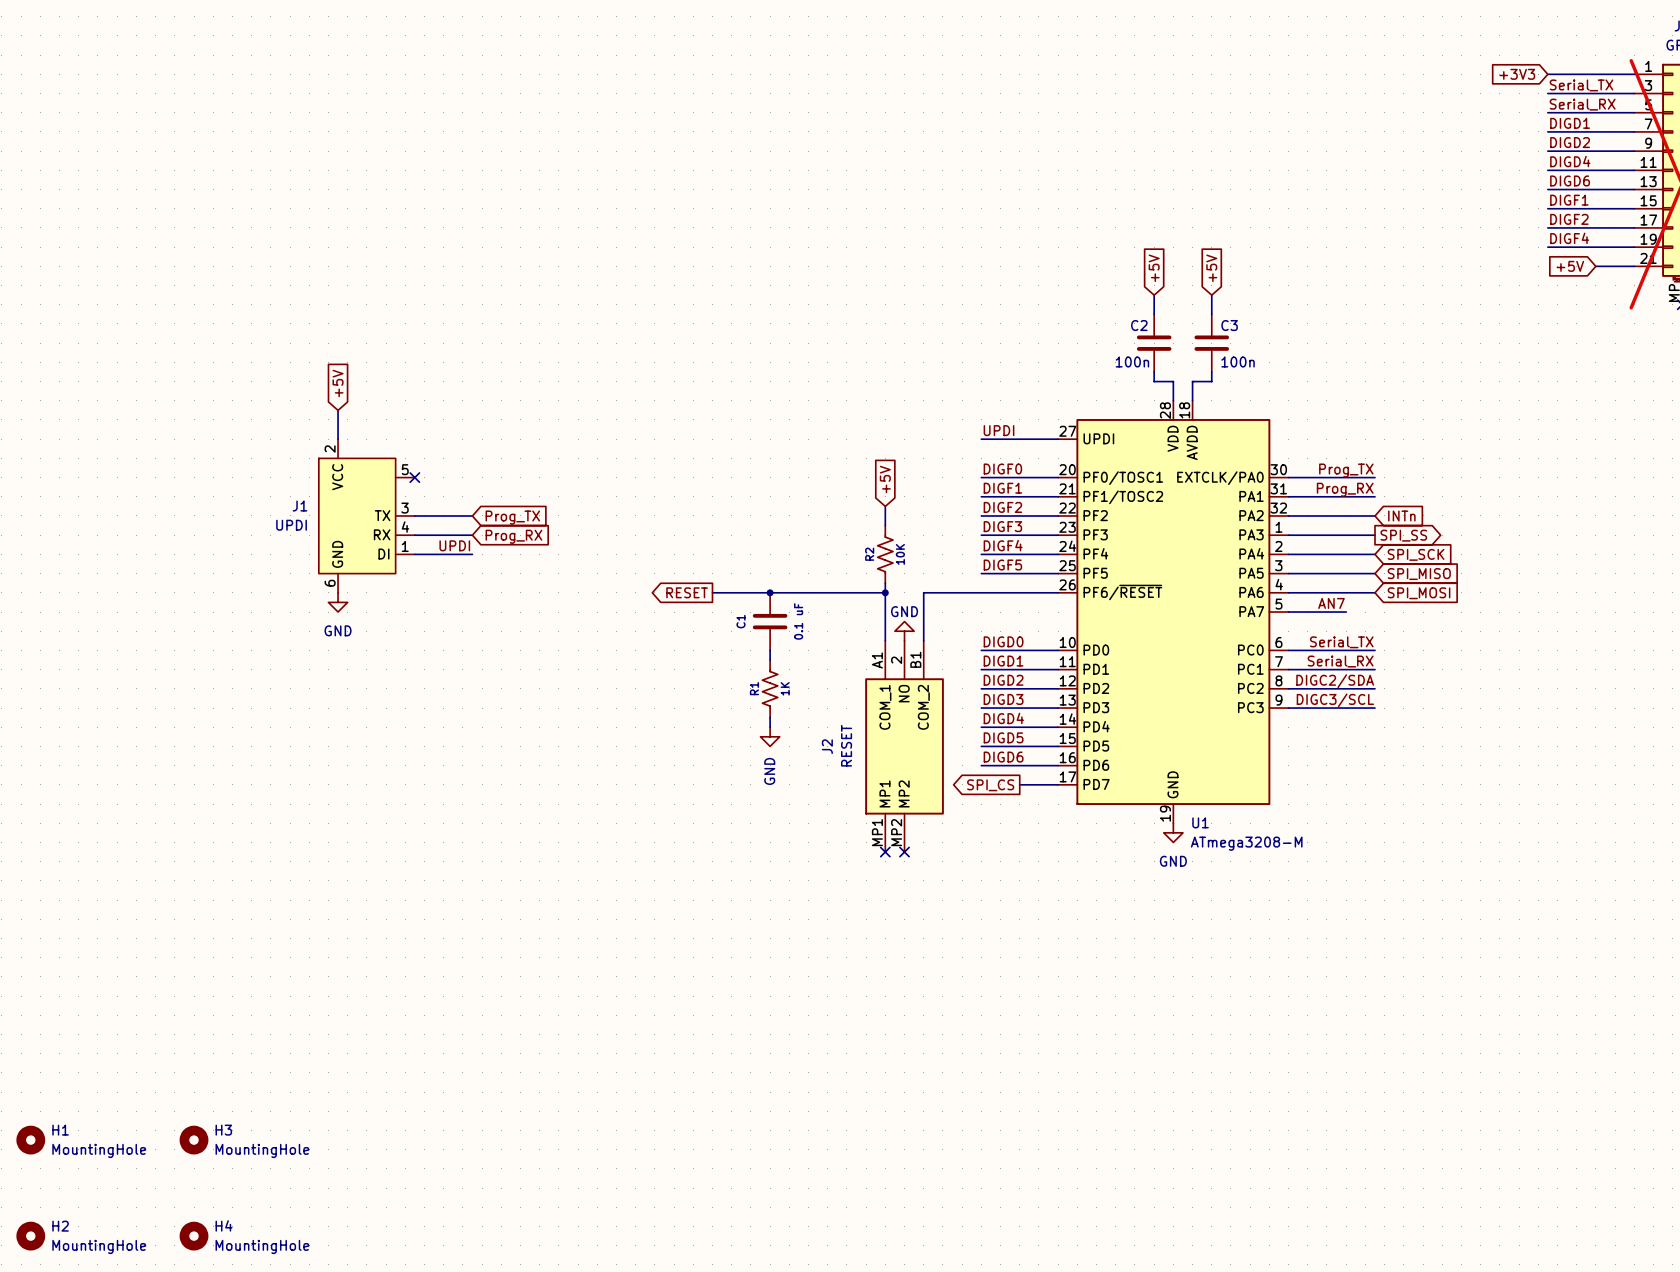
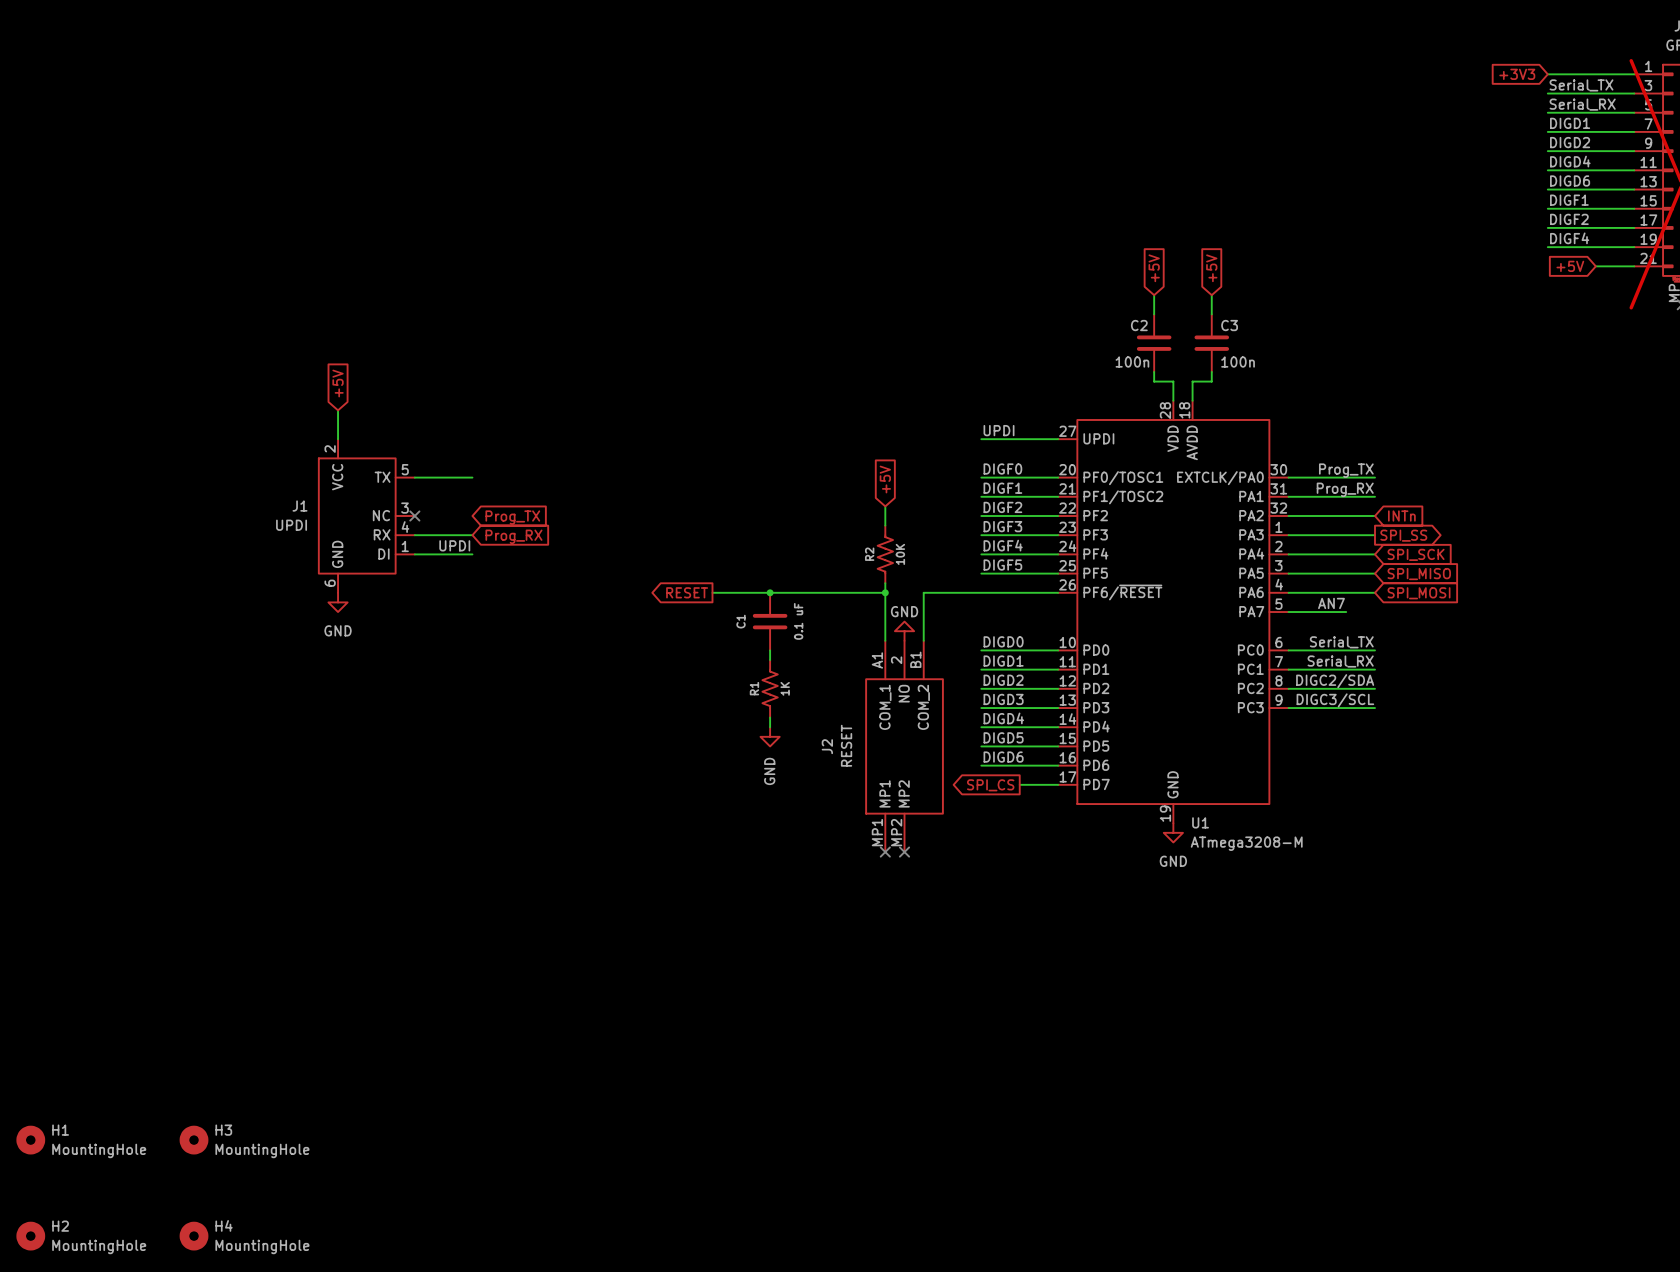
J1 pin name: none -> TX (382, 477)
no-connect mark position: (414, 477) -> (414, 515)
J1 pin name: TX (382, 515) -> NC (381, 515)
wire: (414, 515) (472, 515) -> (414, 477) (472, 477)

